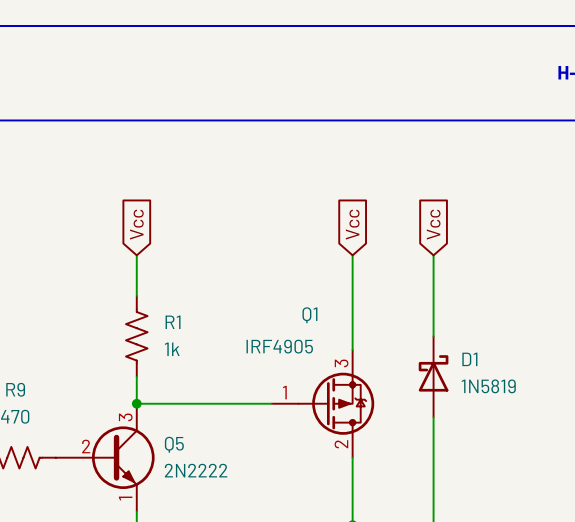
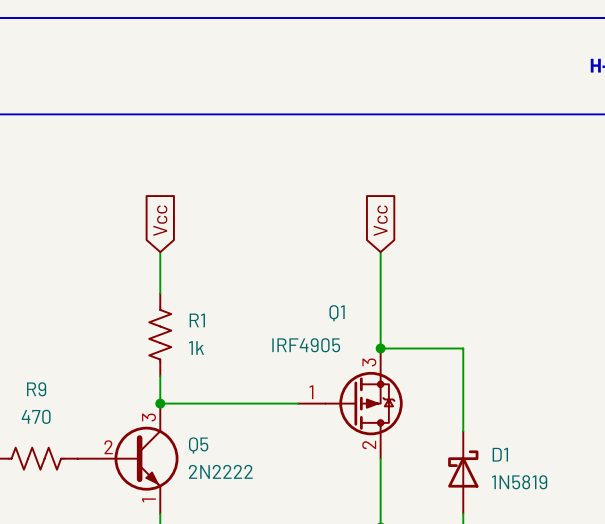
global label: Vcc (433, 224) -> none
wire: (433, 255) (433, 336) -> none
wire: none -> (380, 348) (463, 348) (463, 417)
junction: none -> (380, 348)
D1 position: (433, 376) -> (463, 472)

